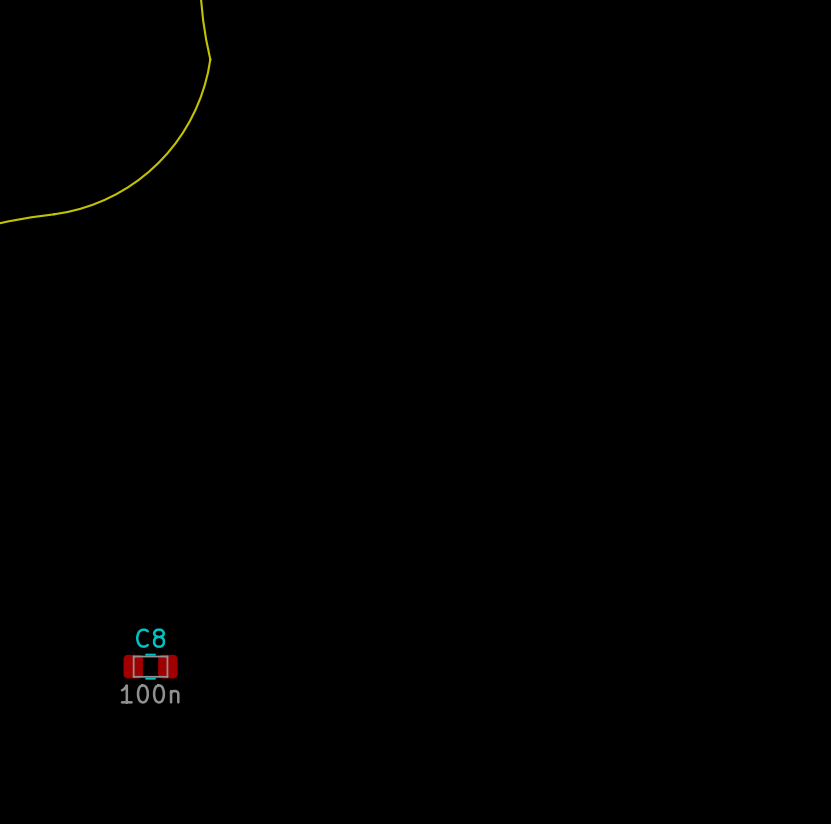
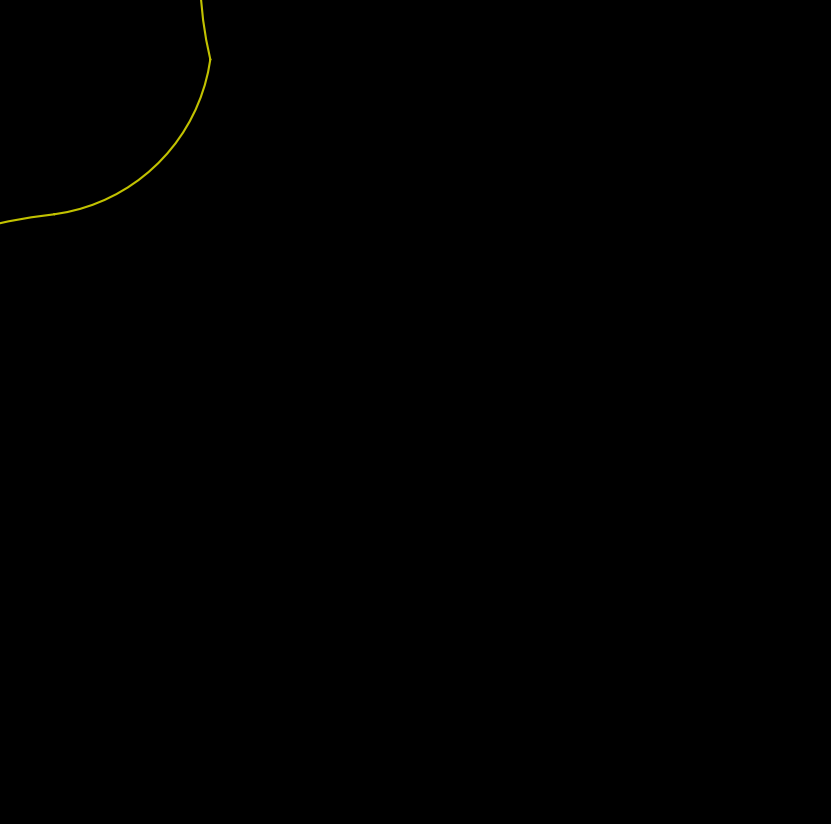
C8: 100n (150, 666) -> none

